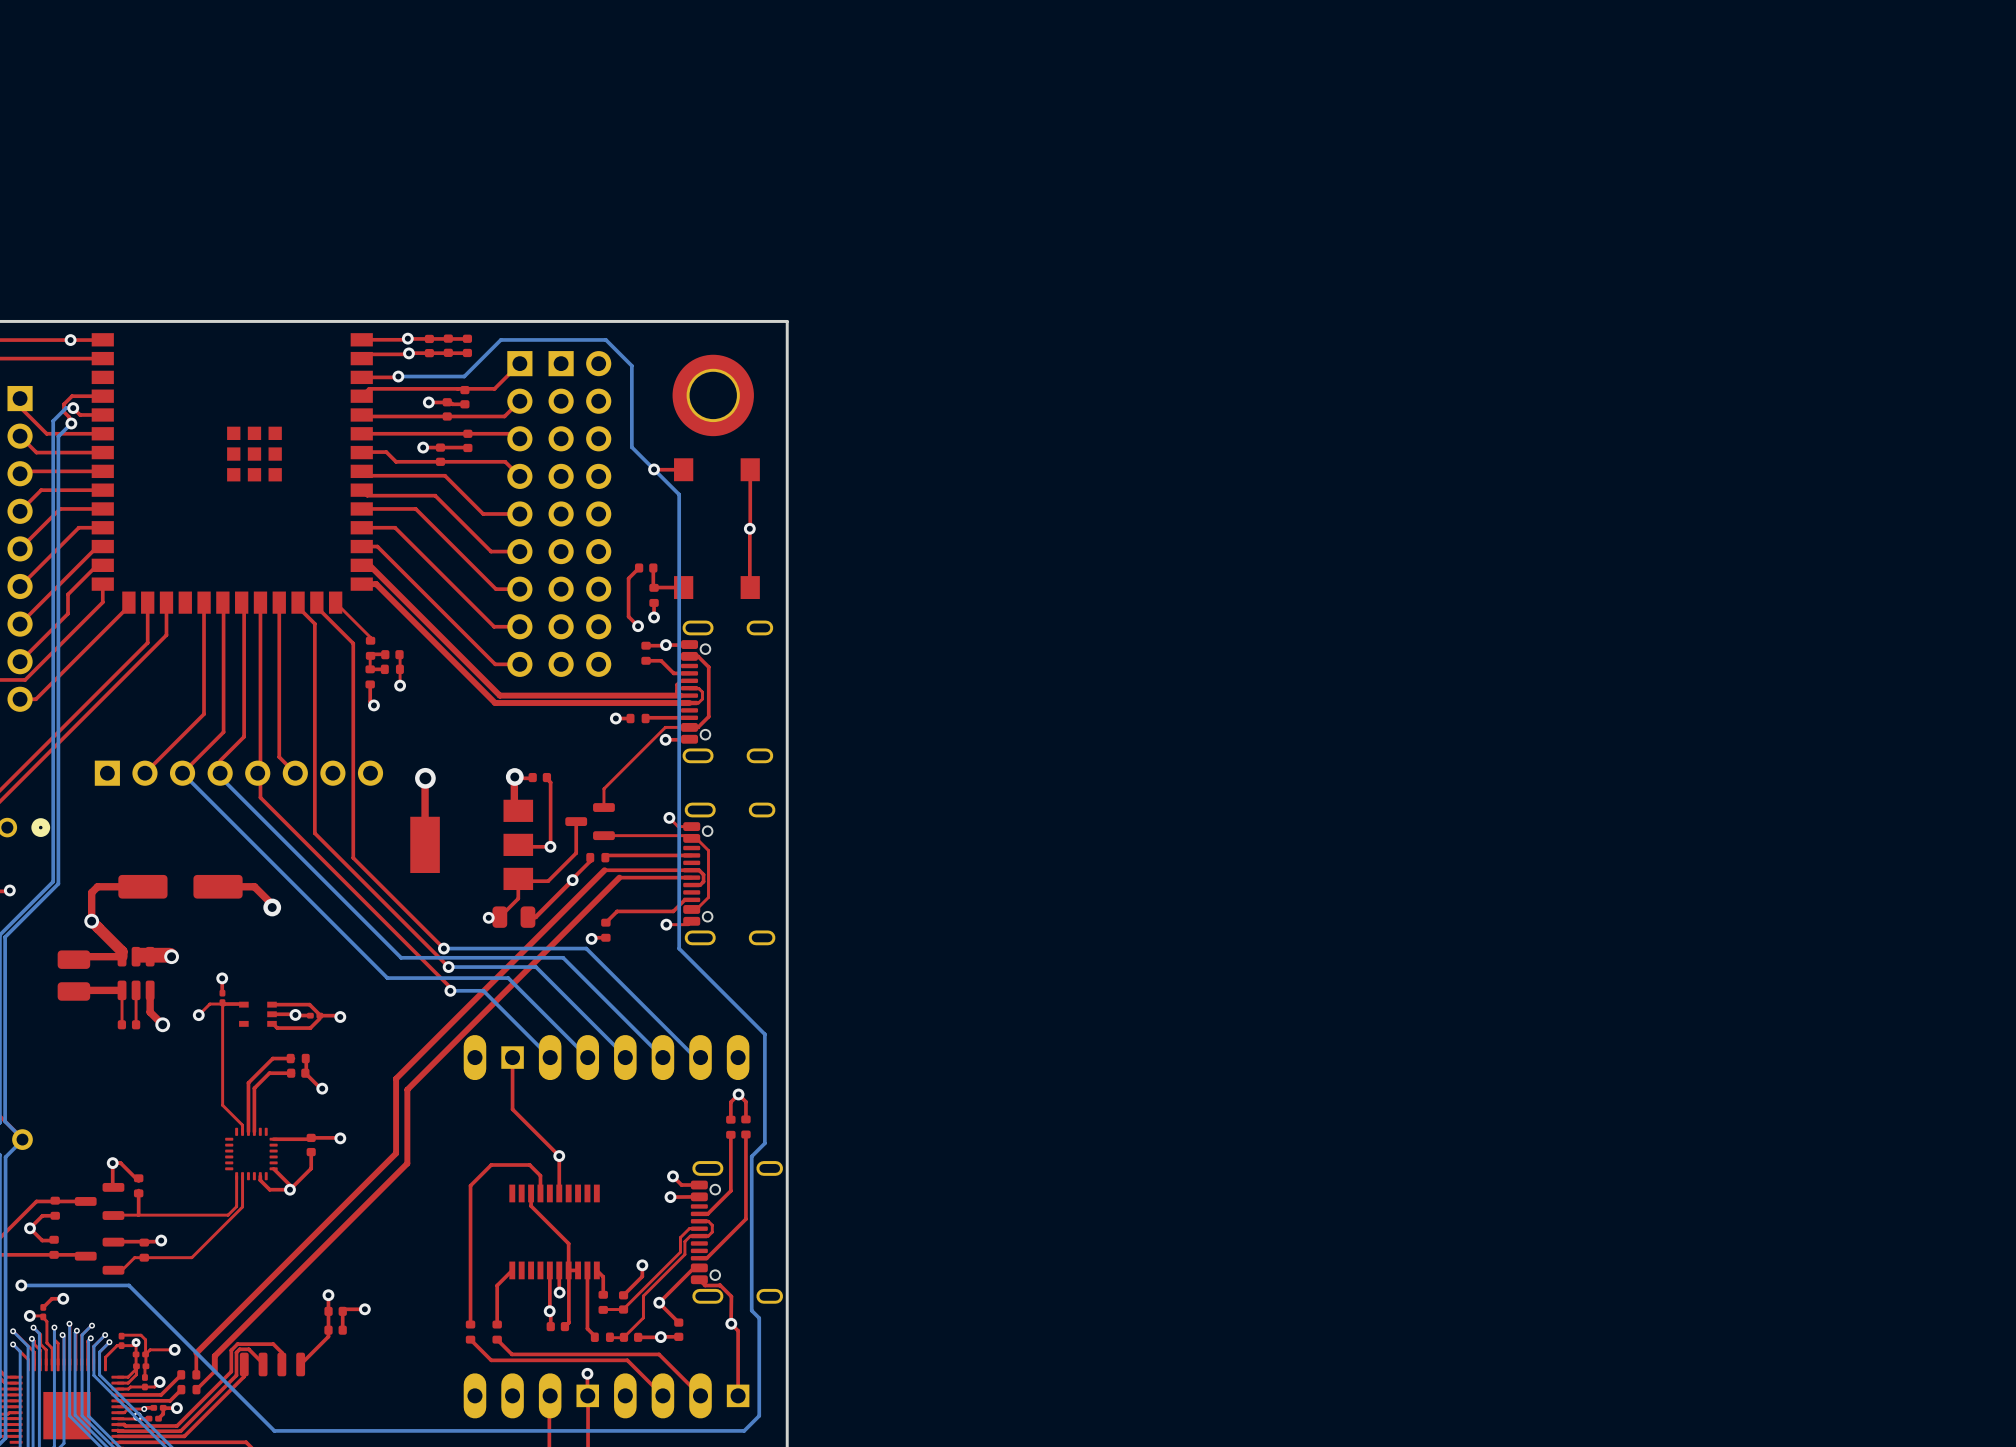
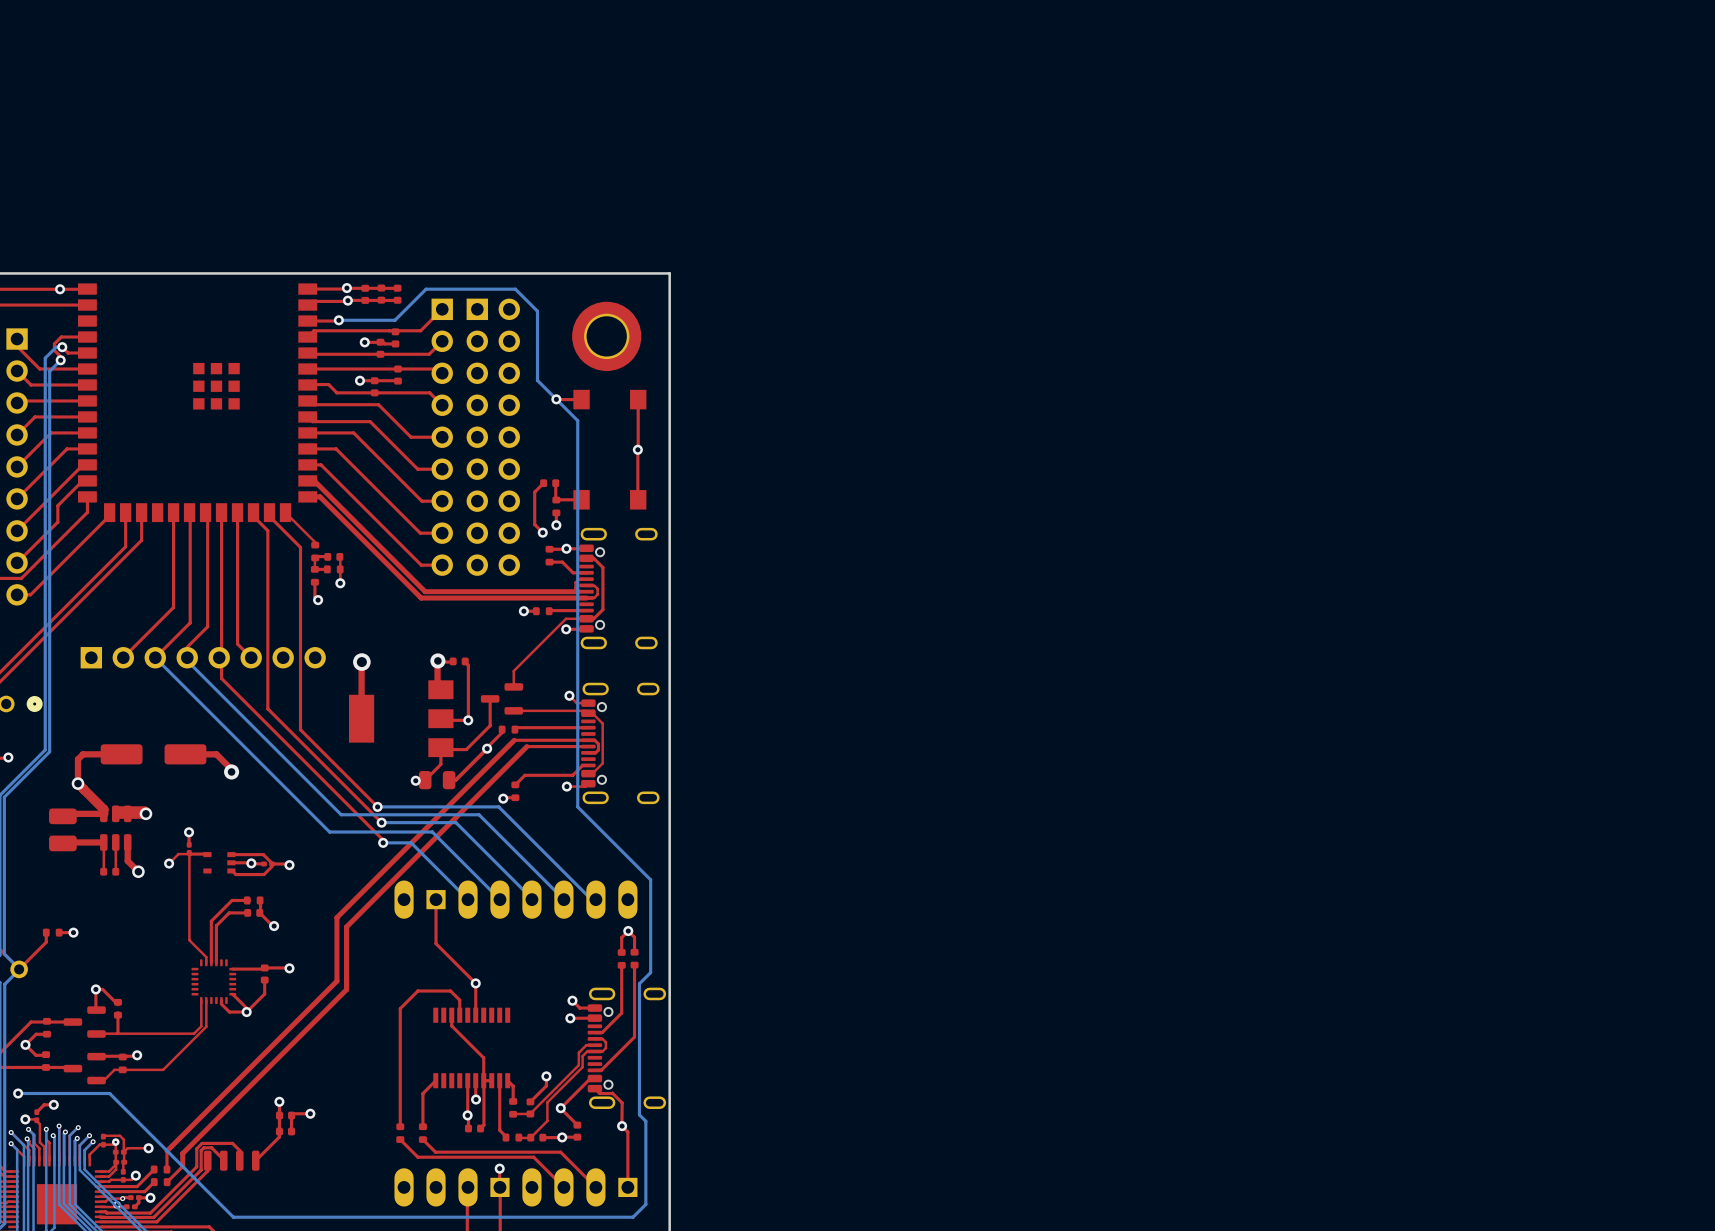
top track: none -> (46, 932) (46, 942) (19, 969)
part: none -> (52, 932)
top track: none -> (73, 932) (59, 932)
via: none -> (73, 932)

